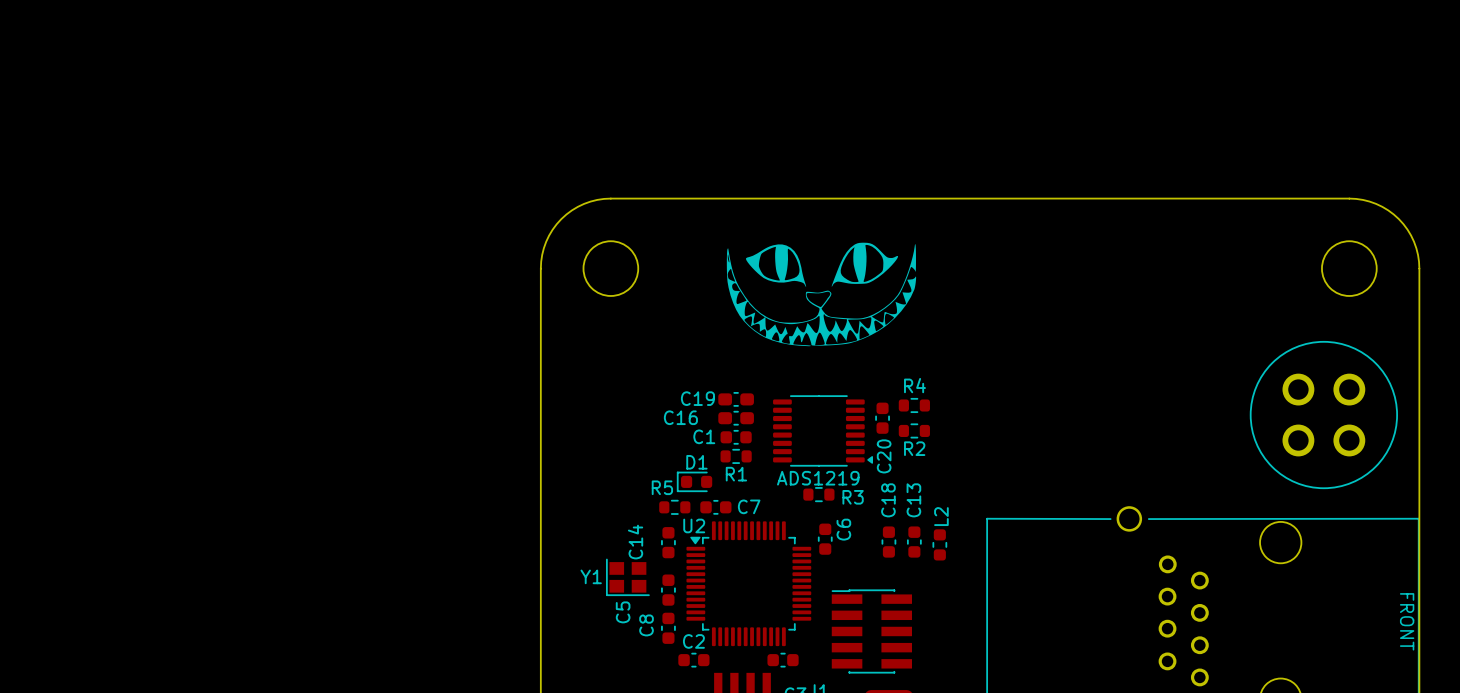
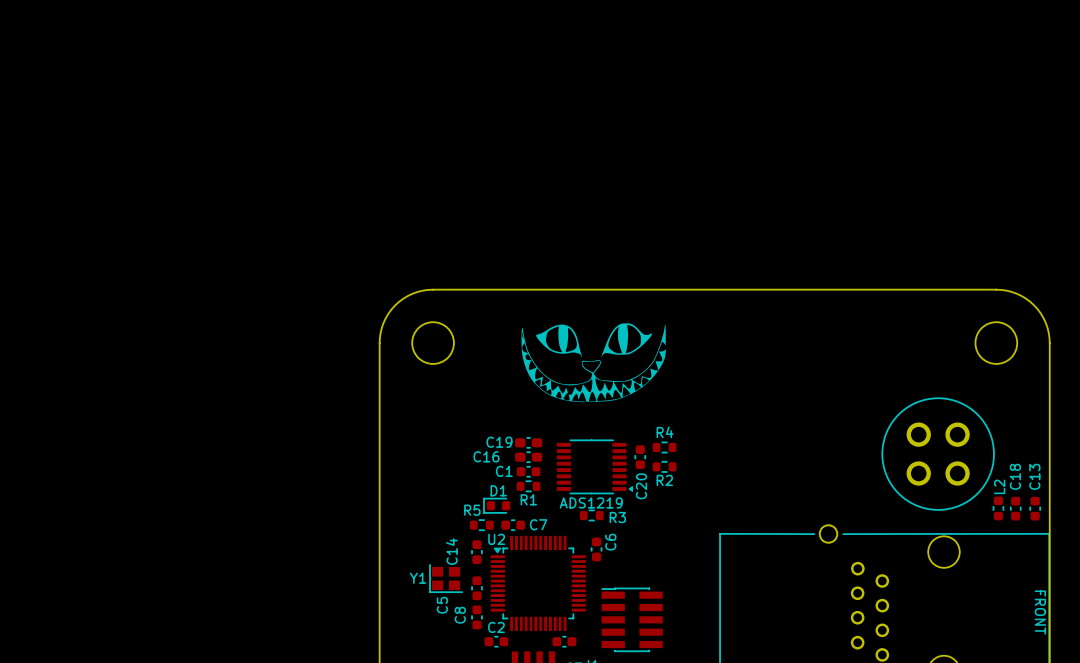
part position: (1323, 415) -> (938, 454)
C18 position: (888, 542) -> (1015, 508)
C13 position: (914, 542) -> (1035, 508)
L2 position: (939, 544) -> (998, 508)

